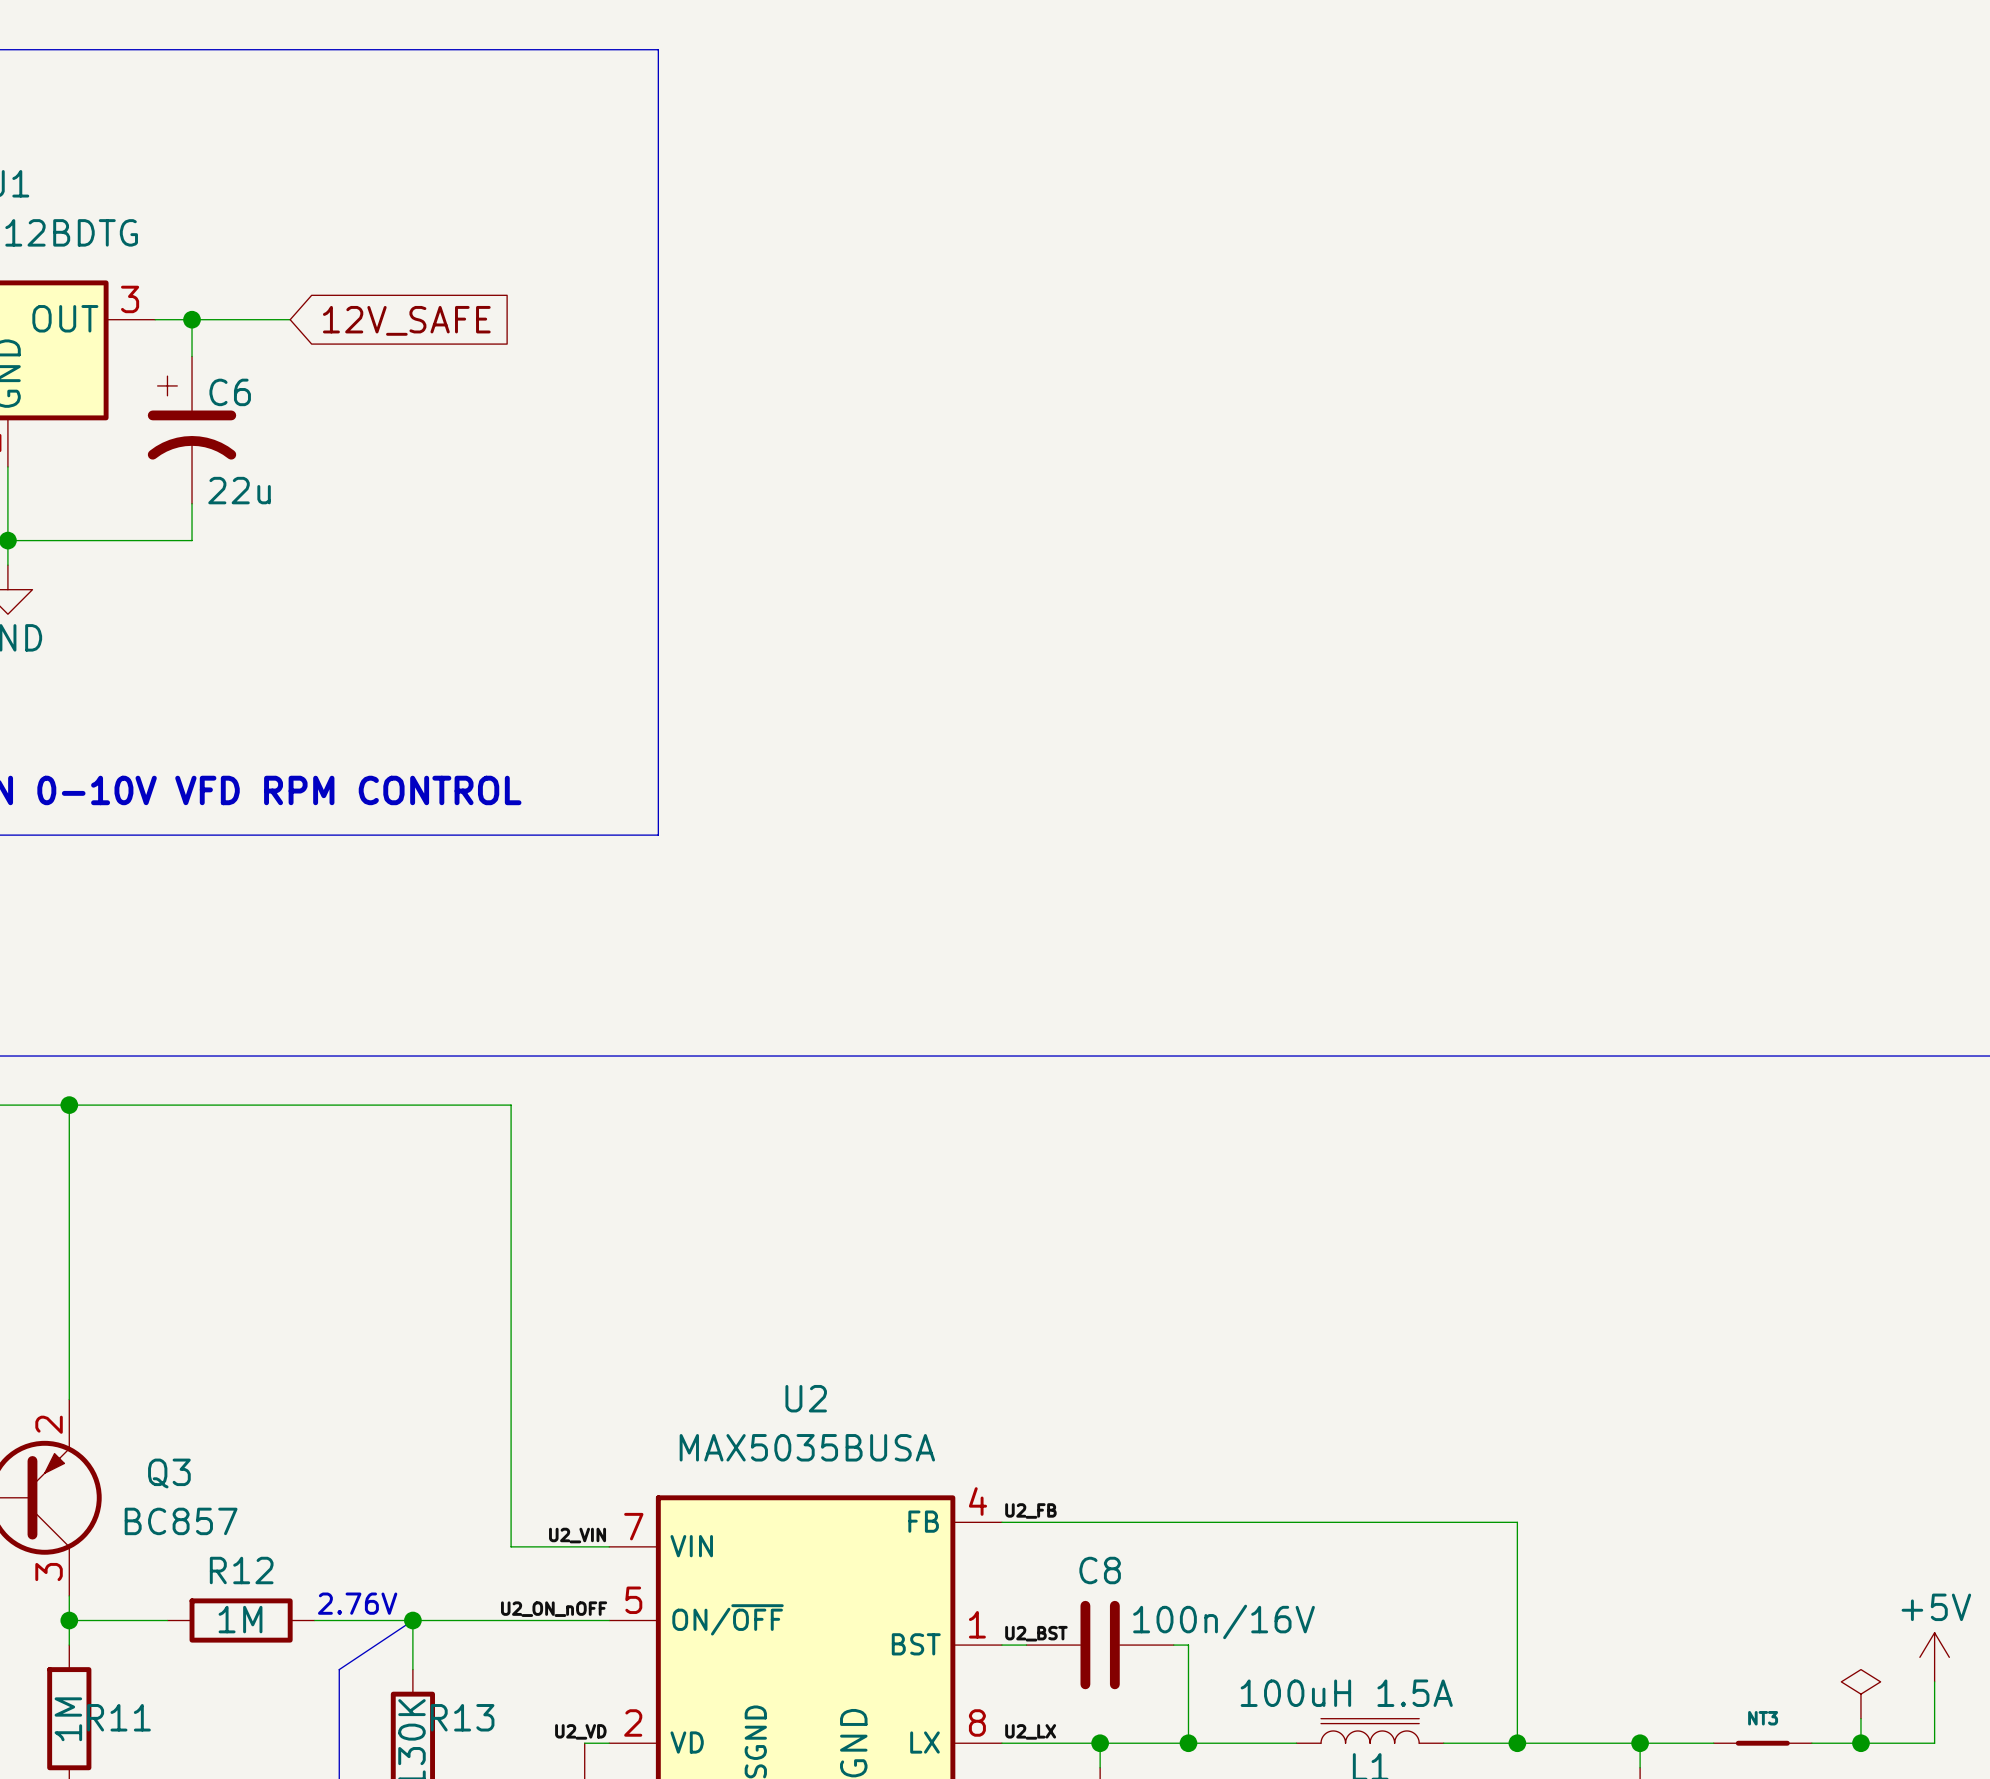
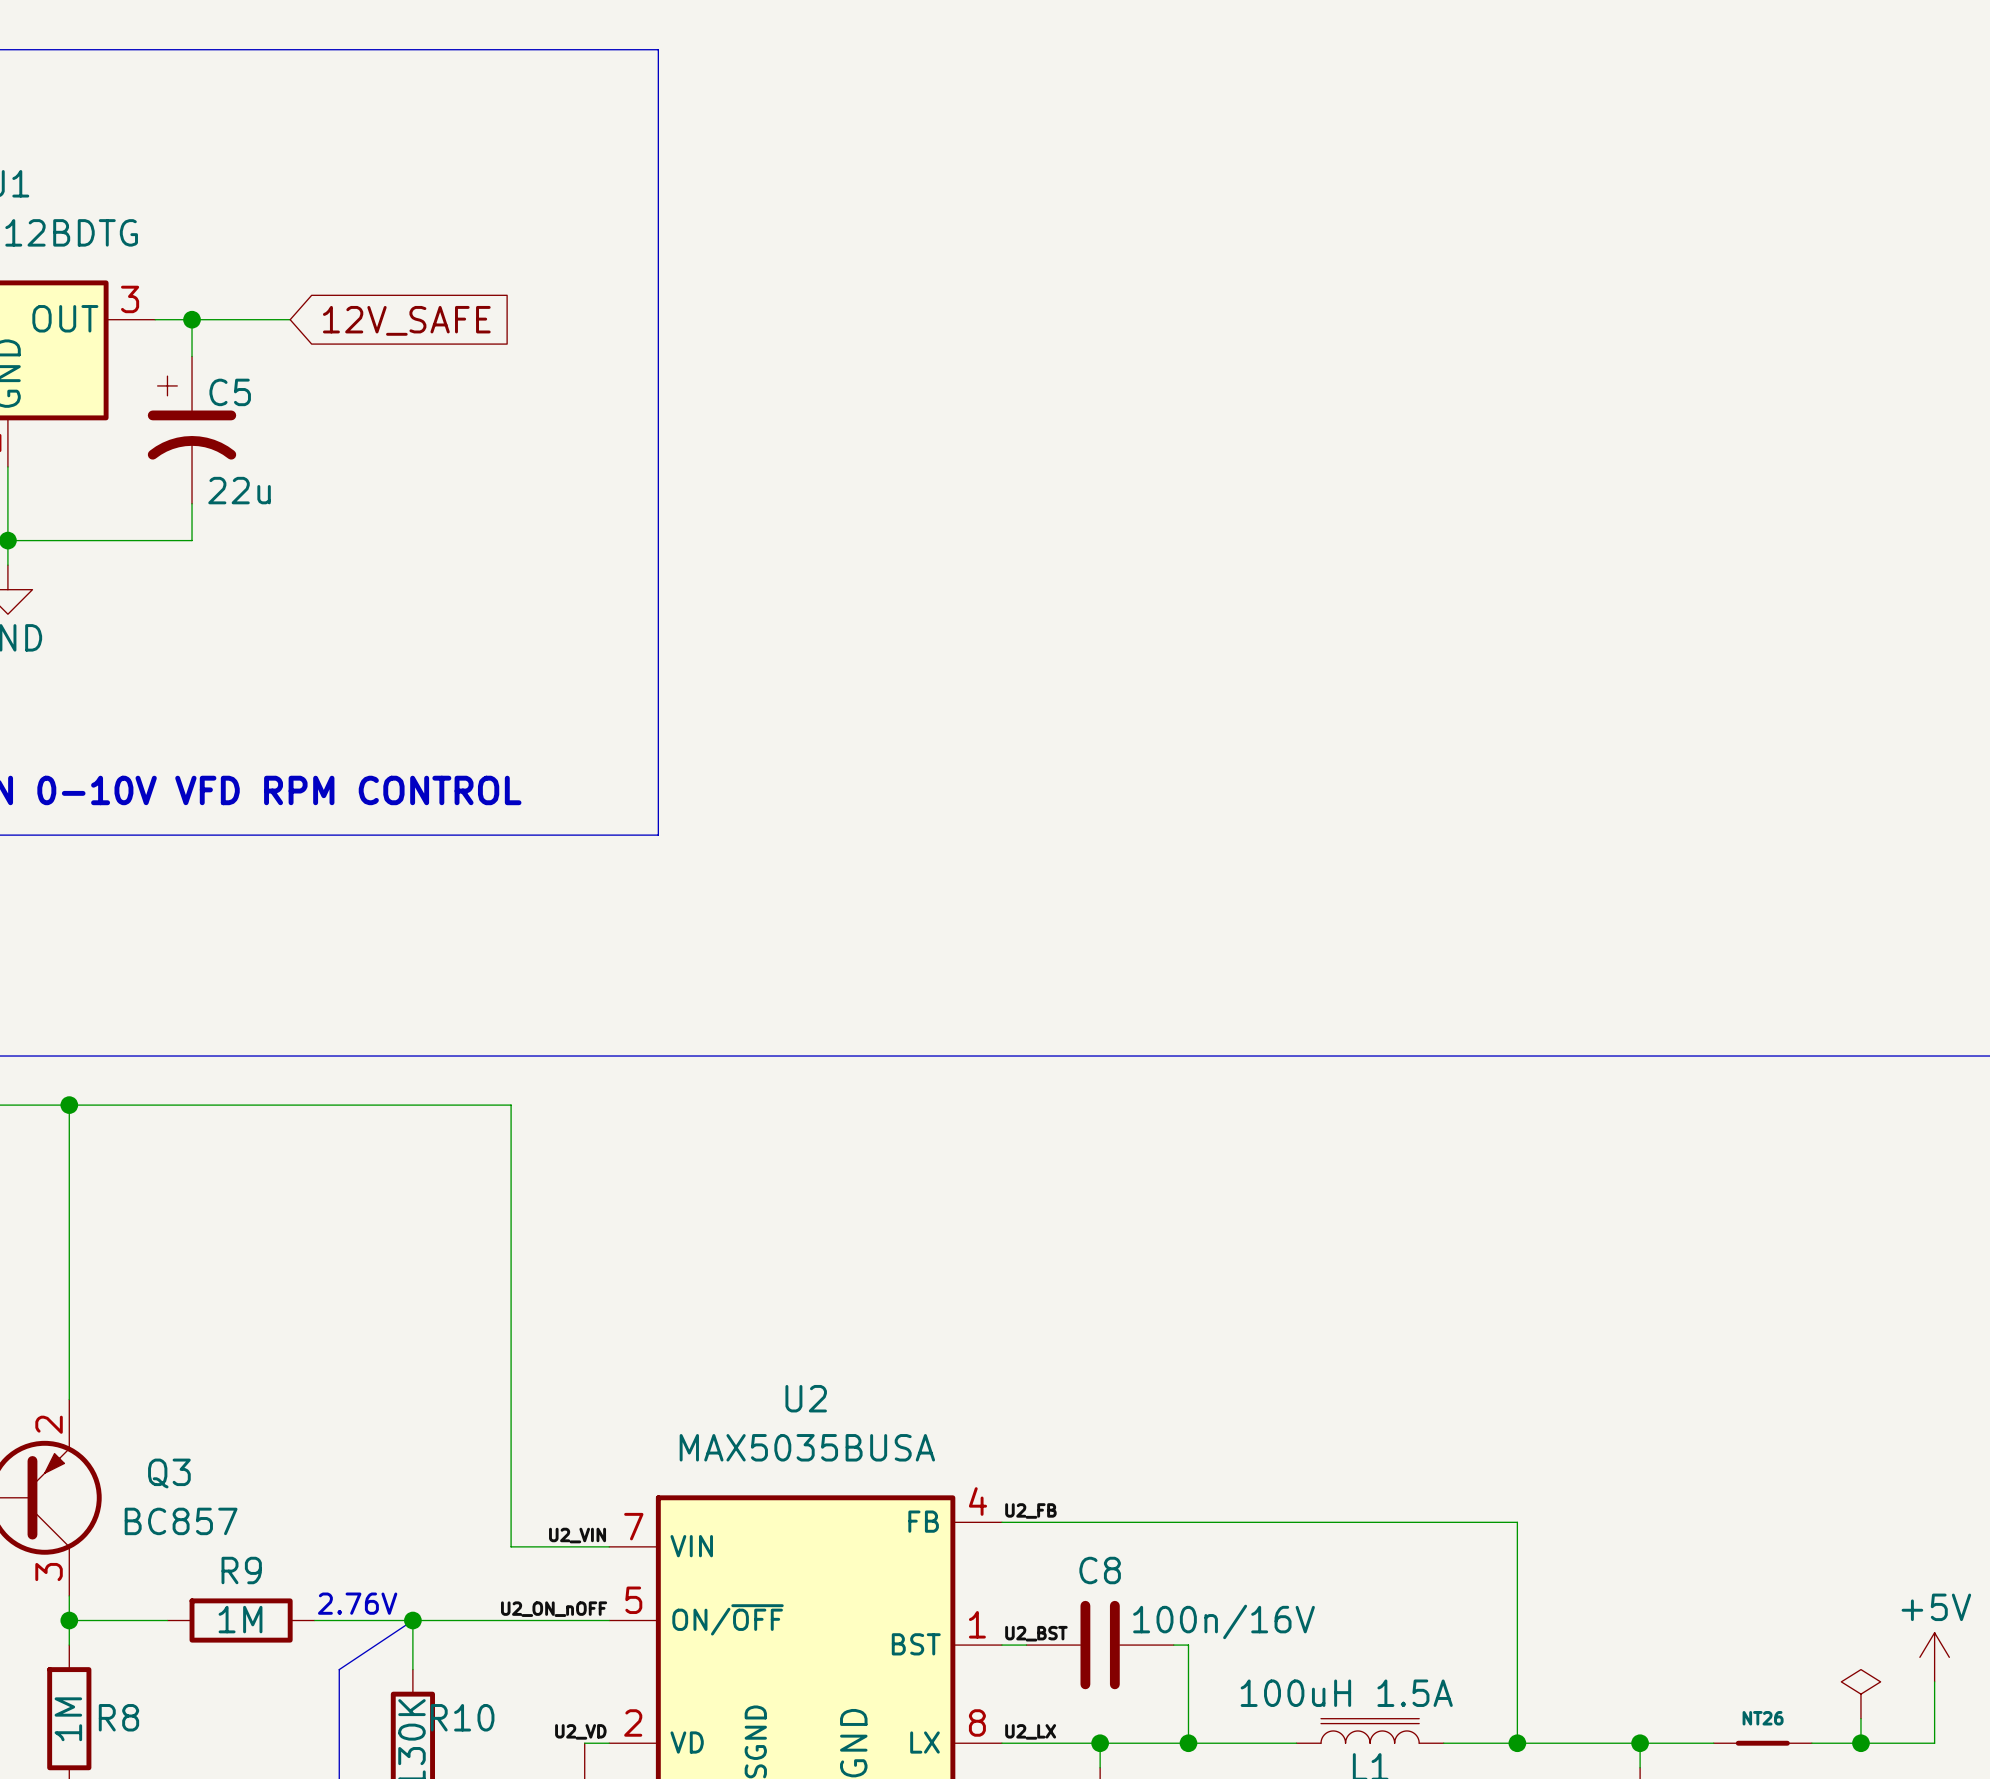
C6 name: C6 (230, 392) -> C5 (230, 392)
R12 name: R12 (241, 1570) -> R9 (241, 1570)
R11 name: R11 (118, 1717) -> R8 (118, 1717)
R13 name: R13 (462, 1717) -> R10 (462, 1717)
NT3 name: NT3 (1763, 1718) -> NT26 (1763, 1718)

